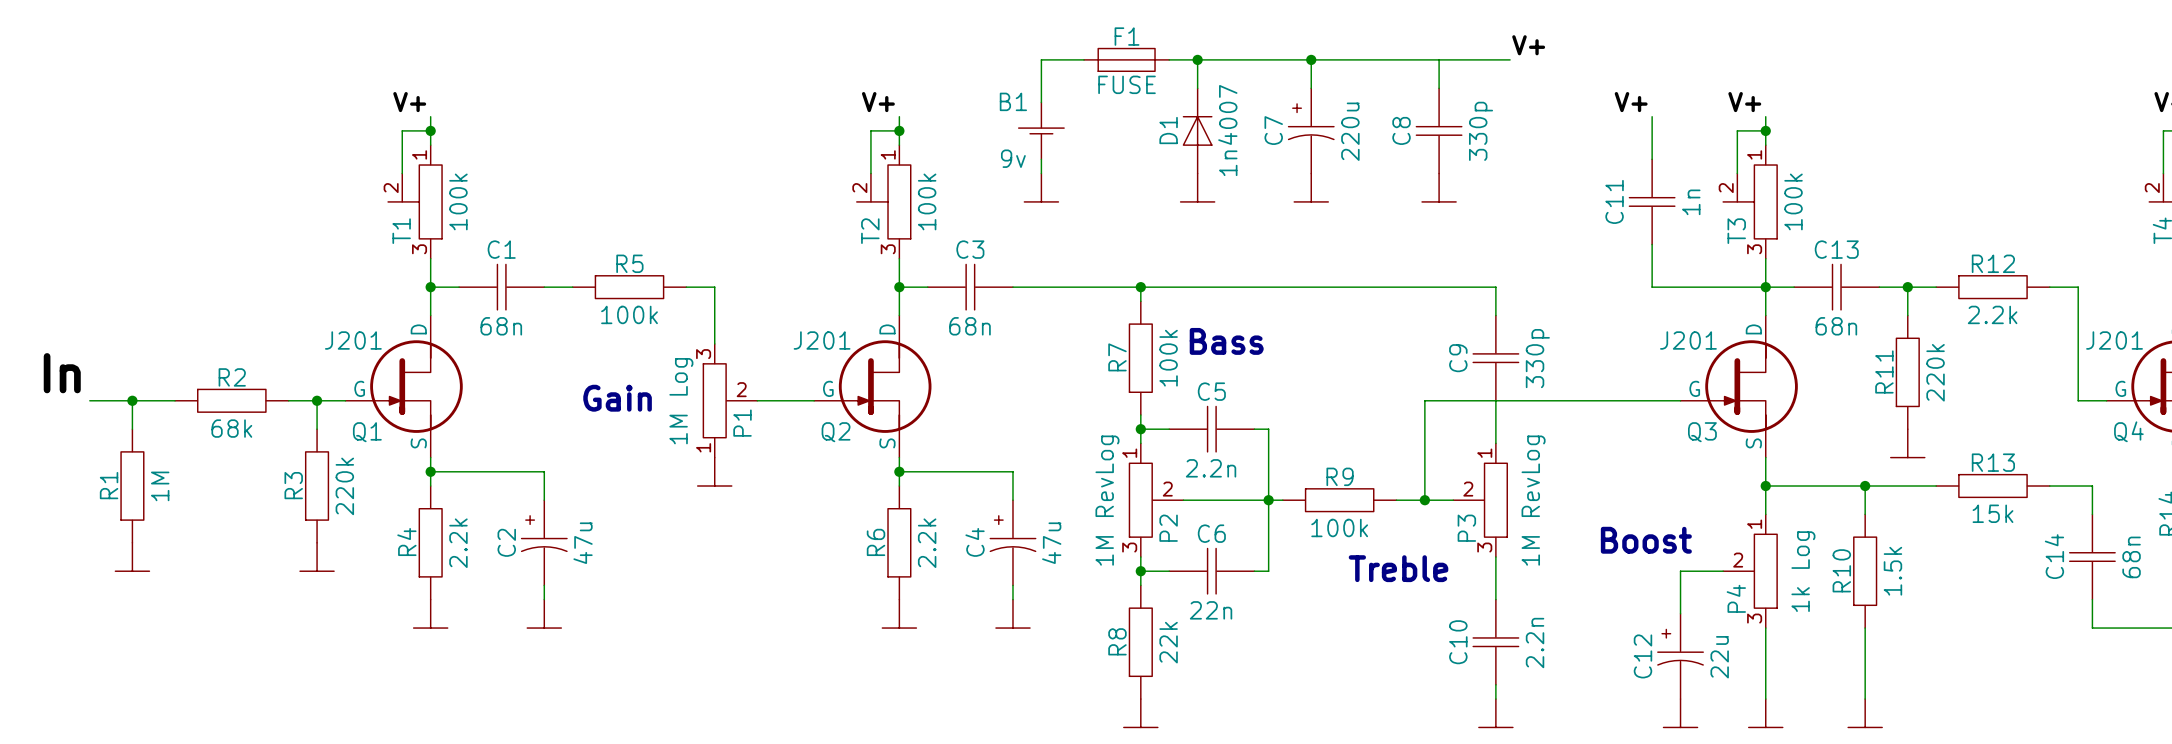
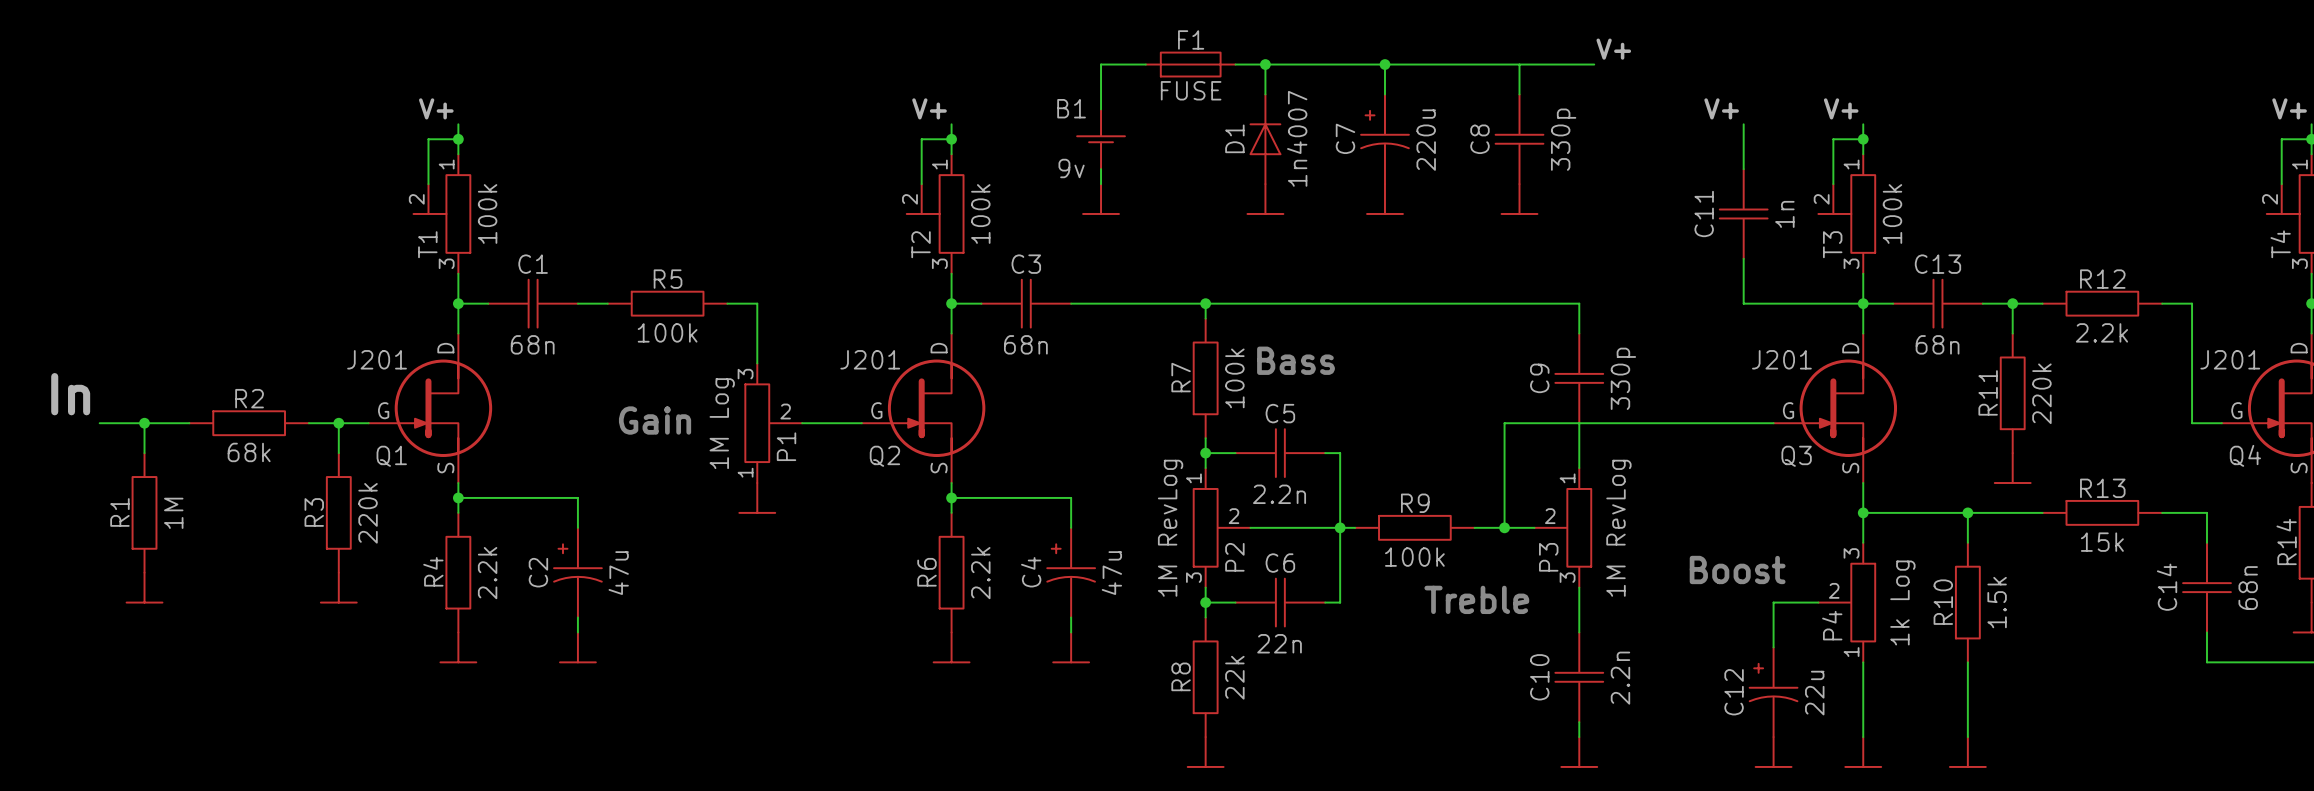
P4 flip: as is (1765, 571) -> up-down (1863, 602)

